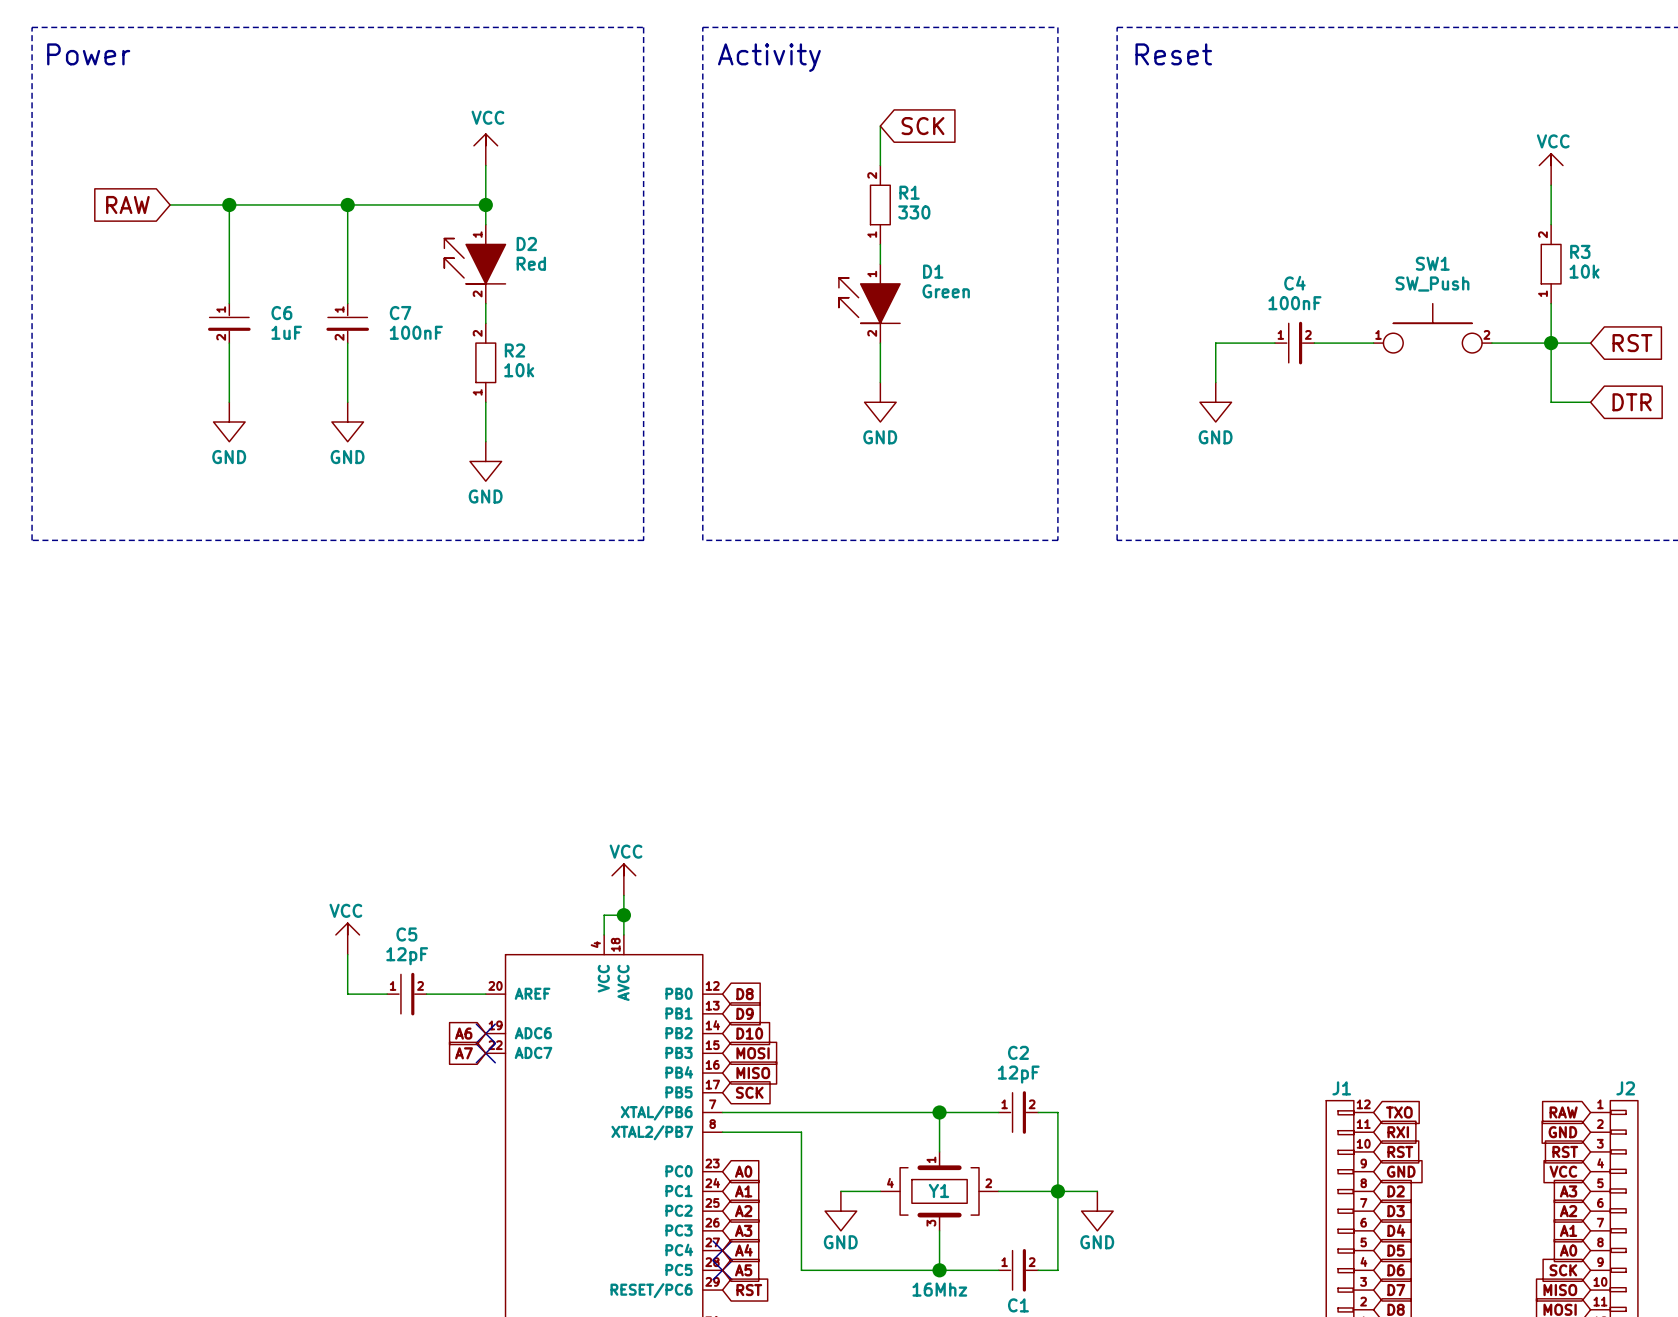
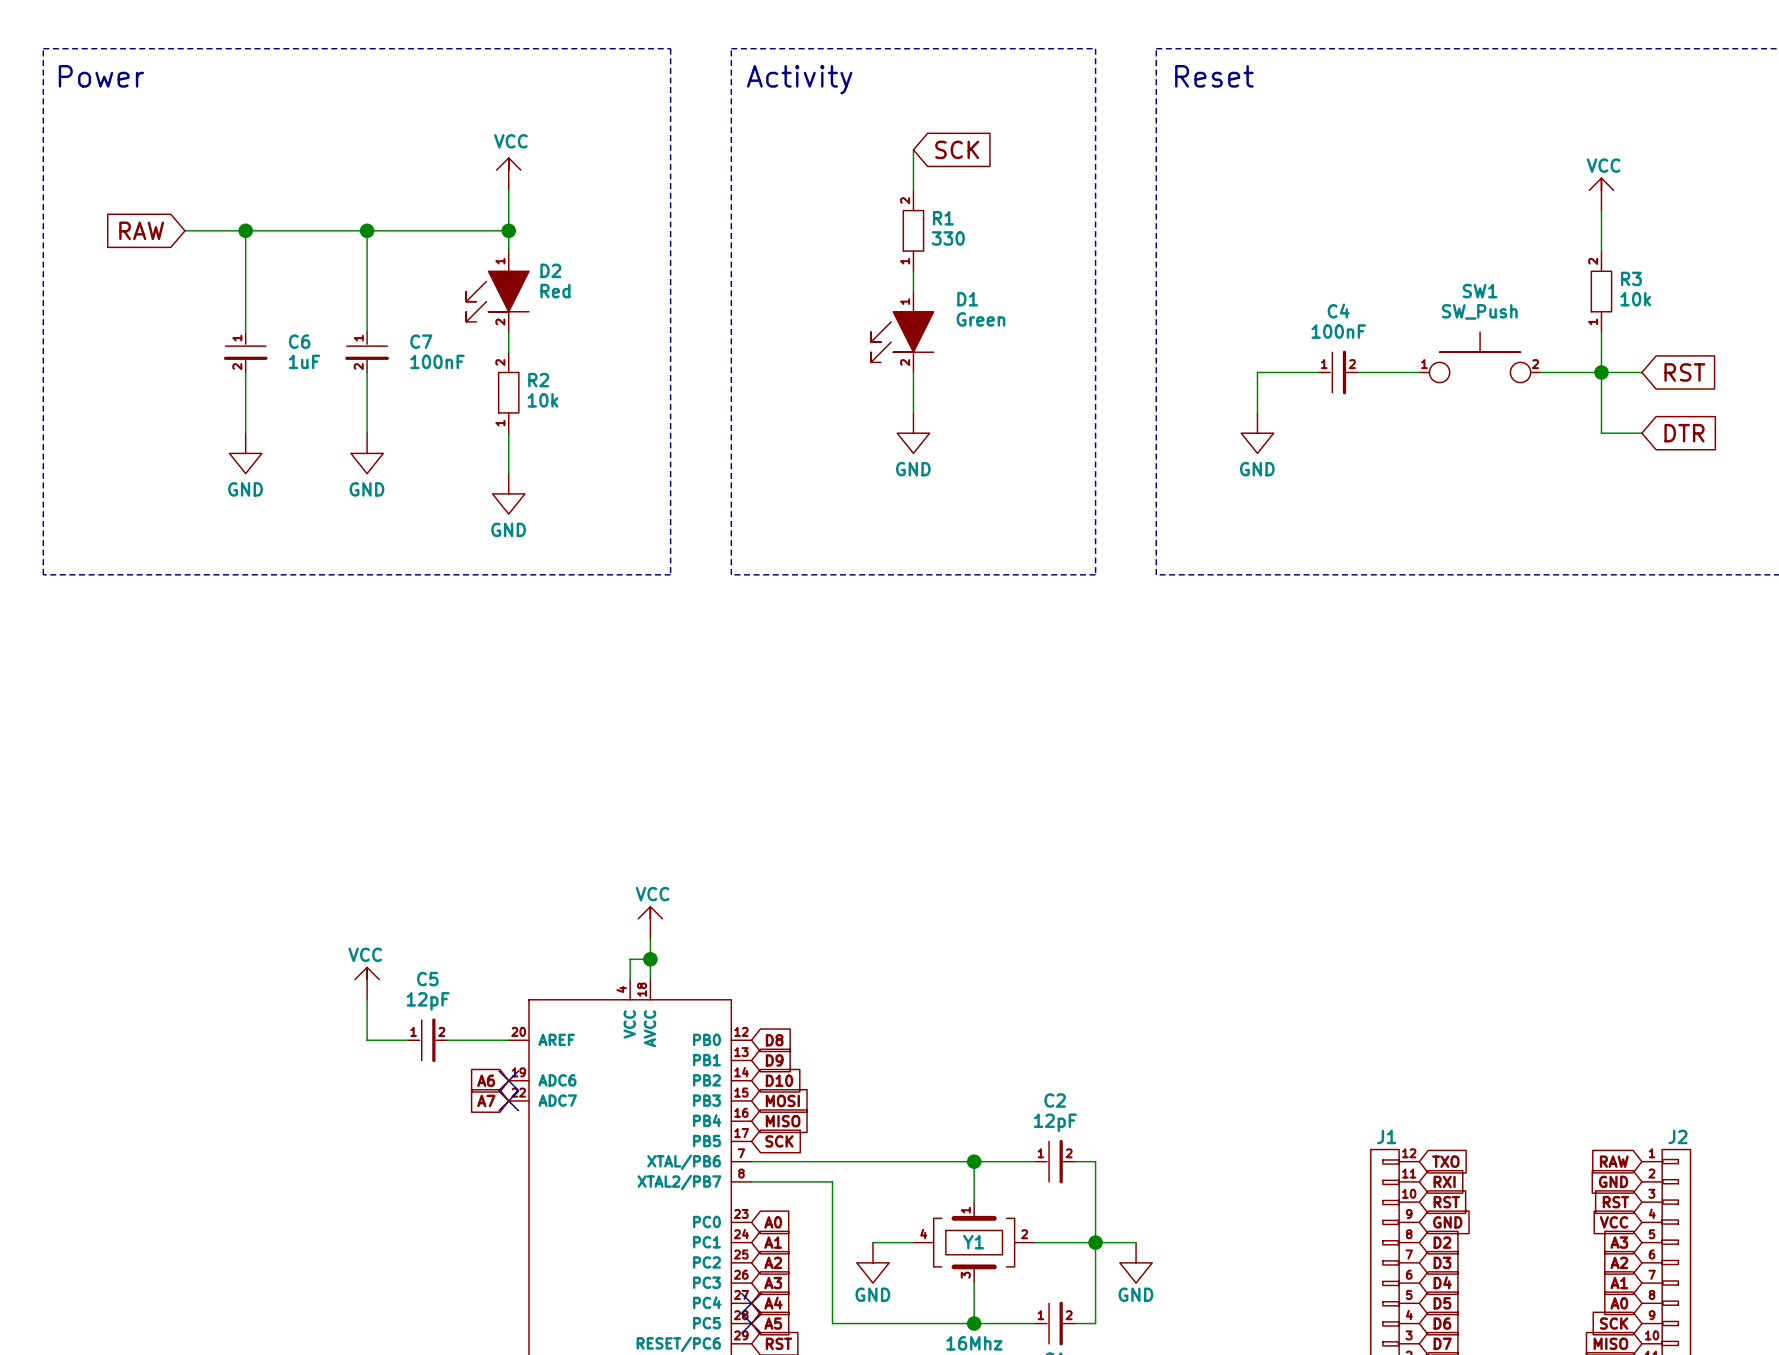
D2 symbol: [444, 224, 506, 304] -> [466, 251, 529, 333]
D1 symbol: [838, 264, 901, 344] -> [870, 291, 934, 373]

